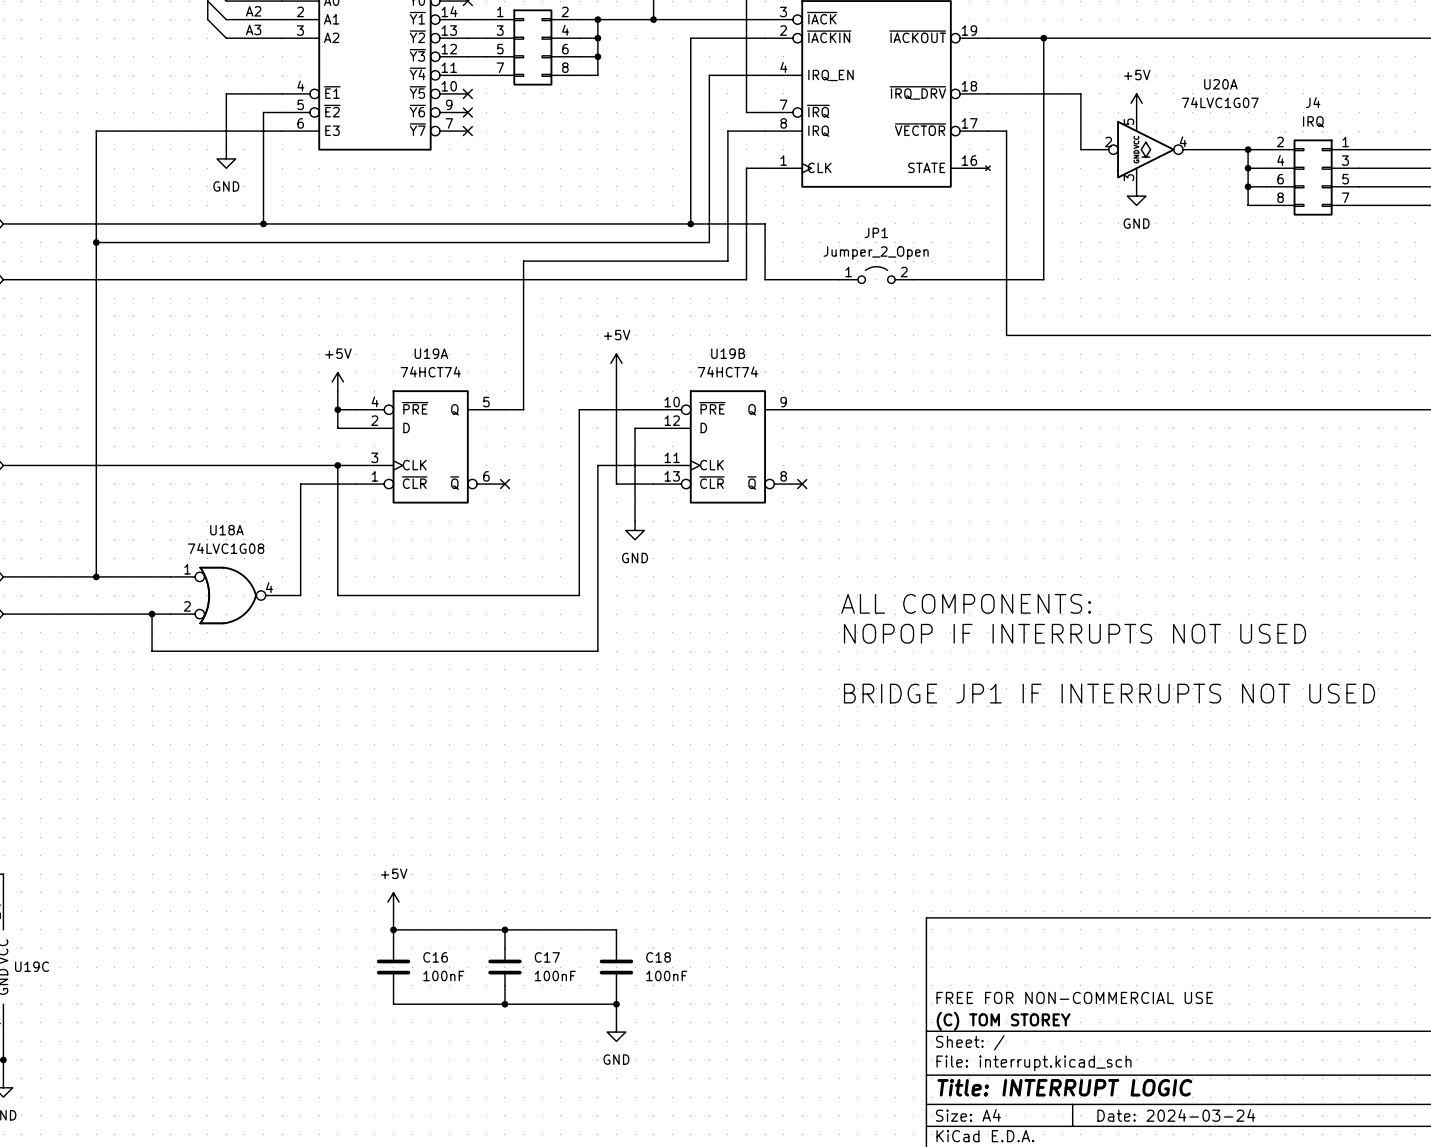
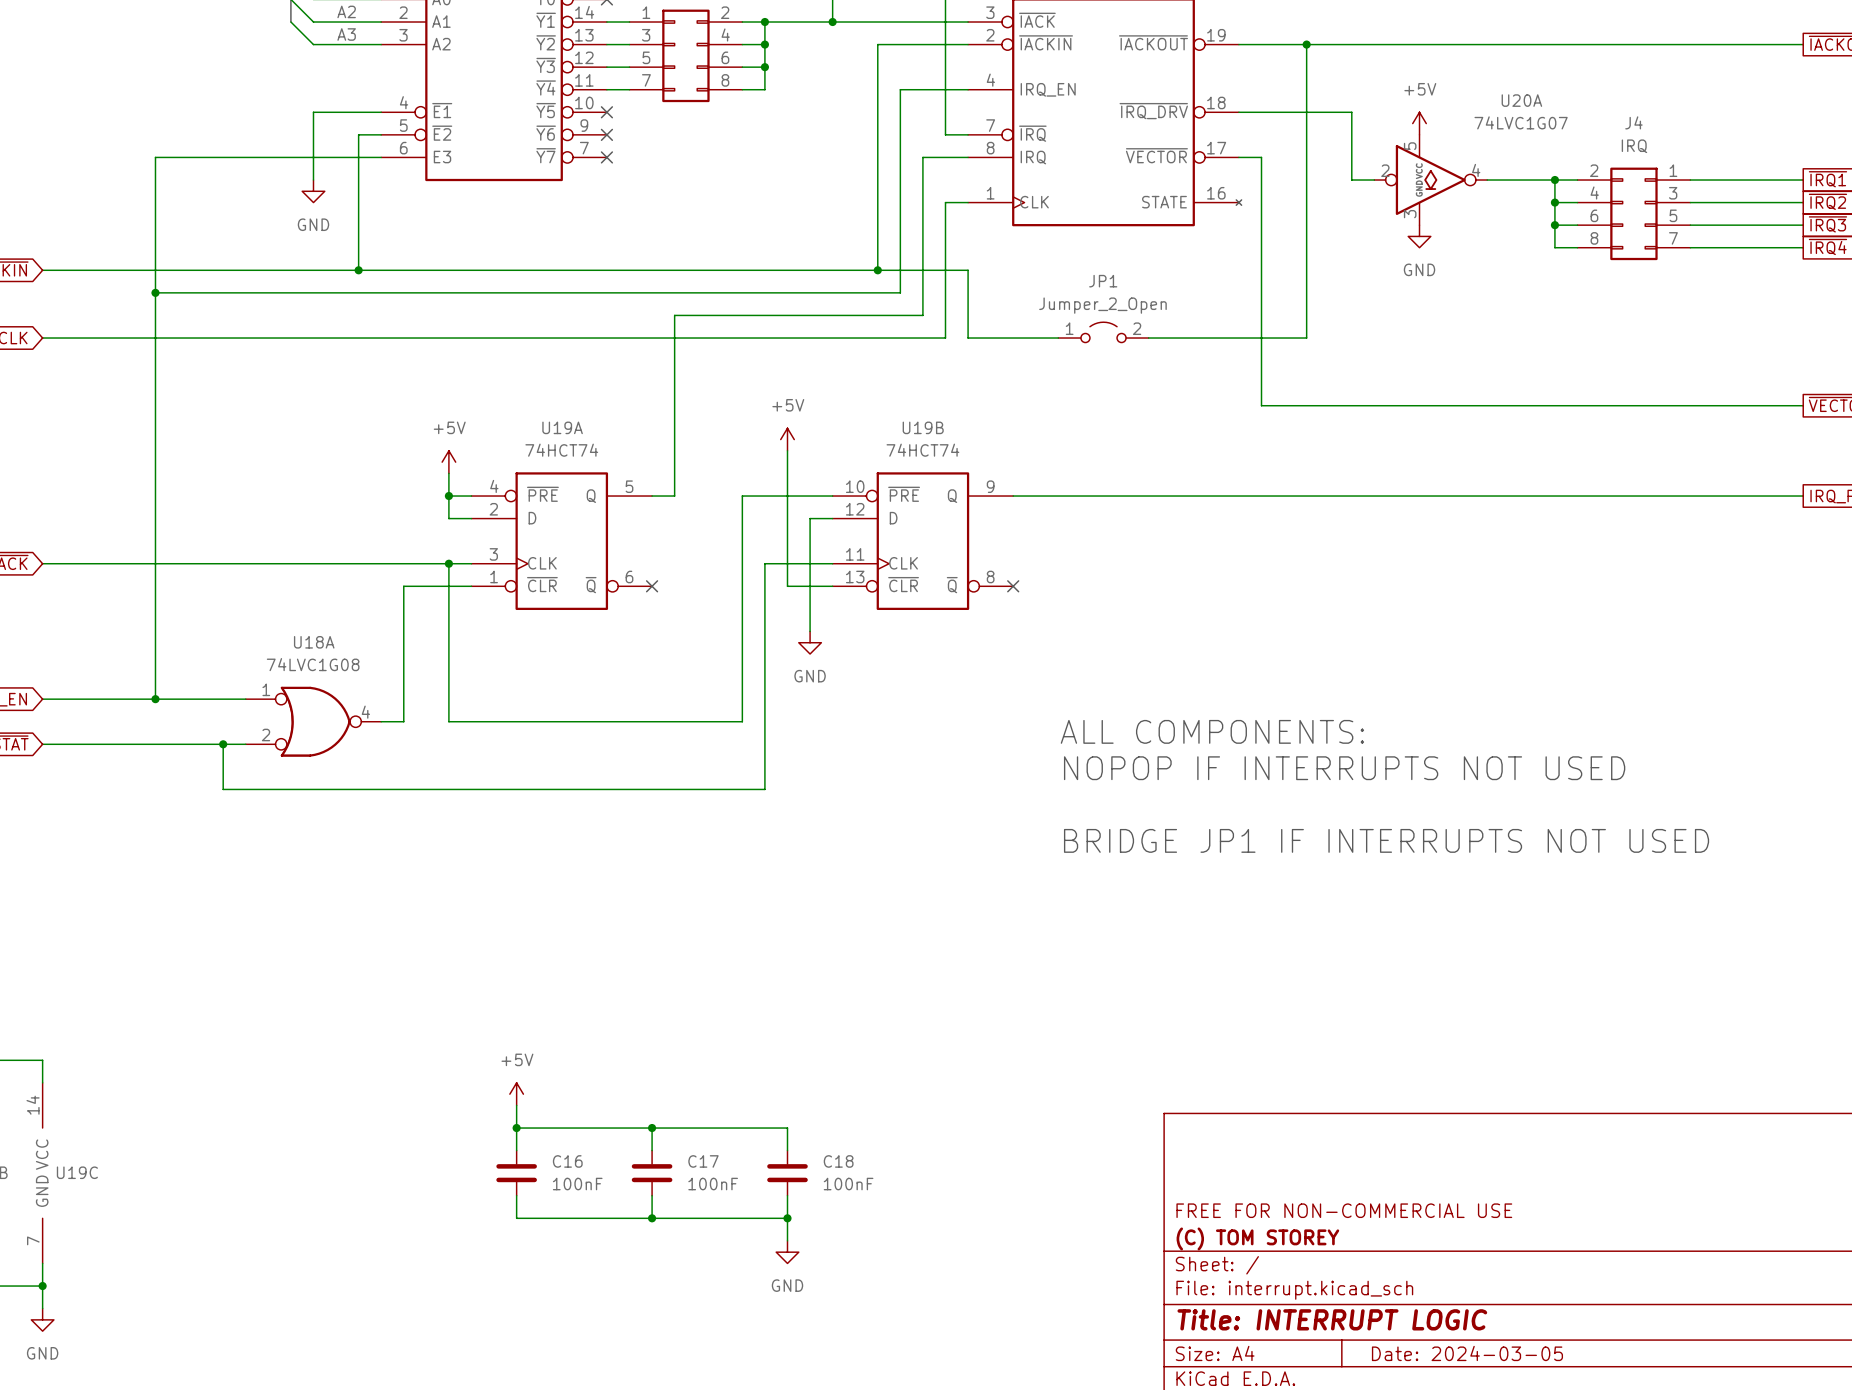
title block: Date: 2024-03-24 (1176, 1115) -> Date: 2024-03-05 (1467, 1353)

